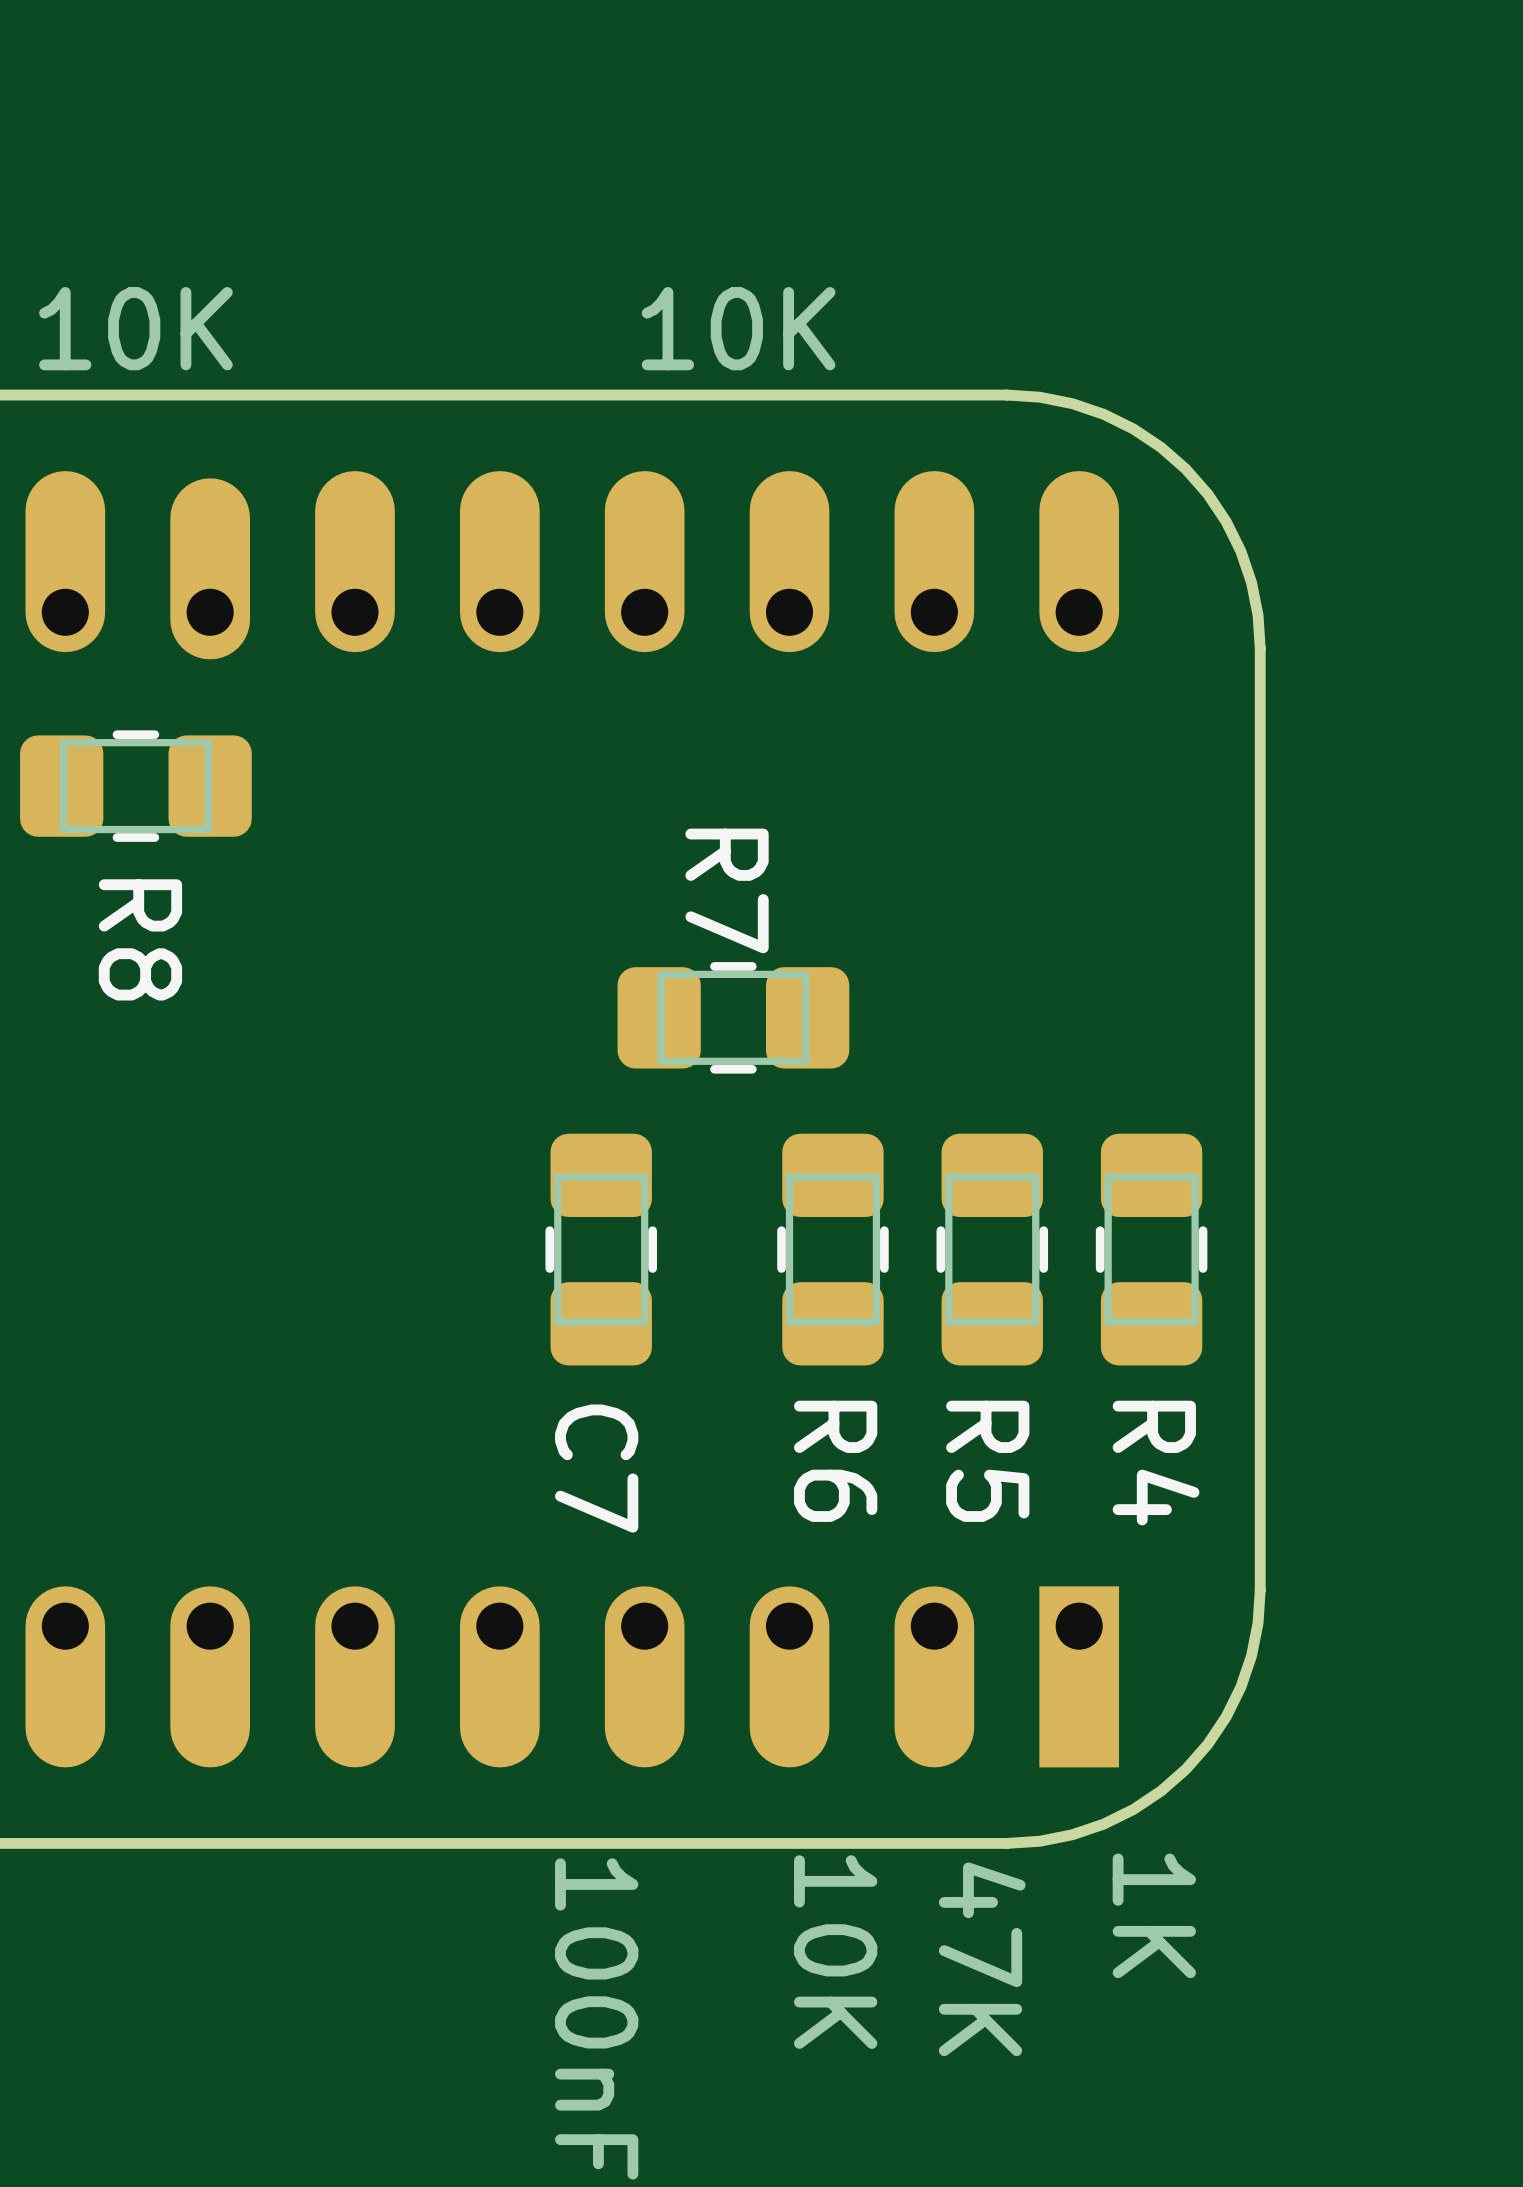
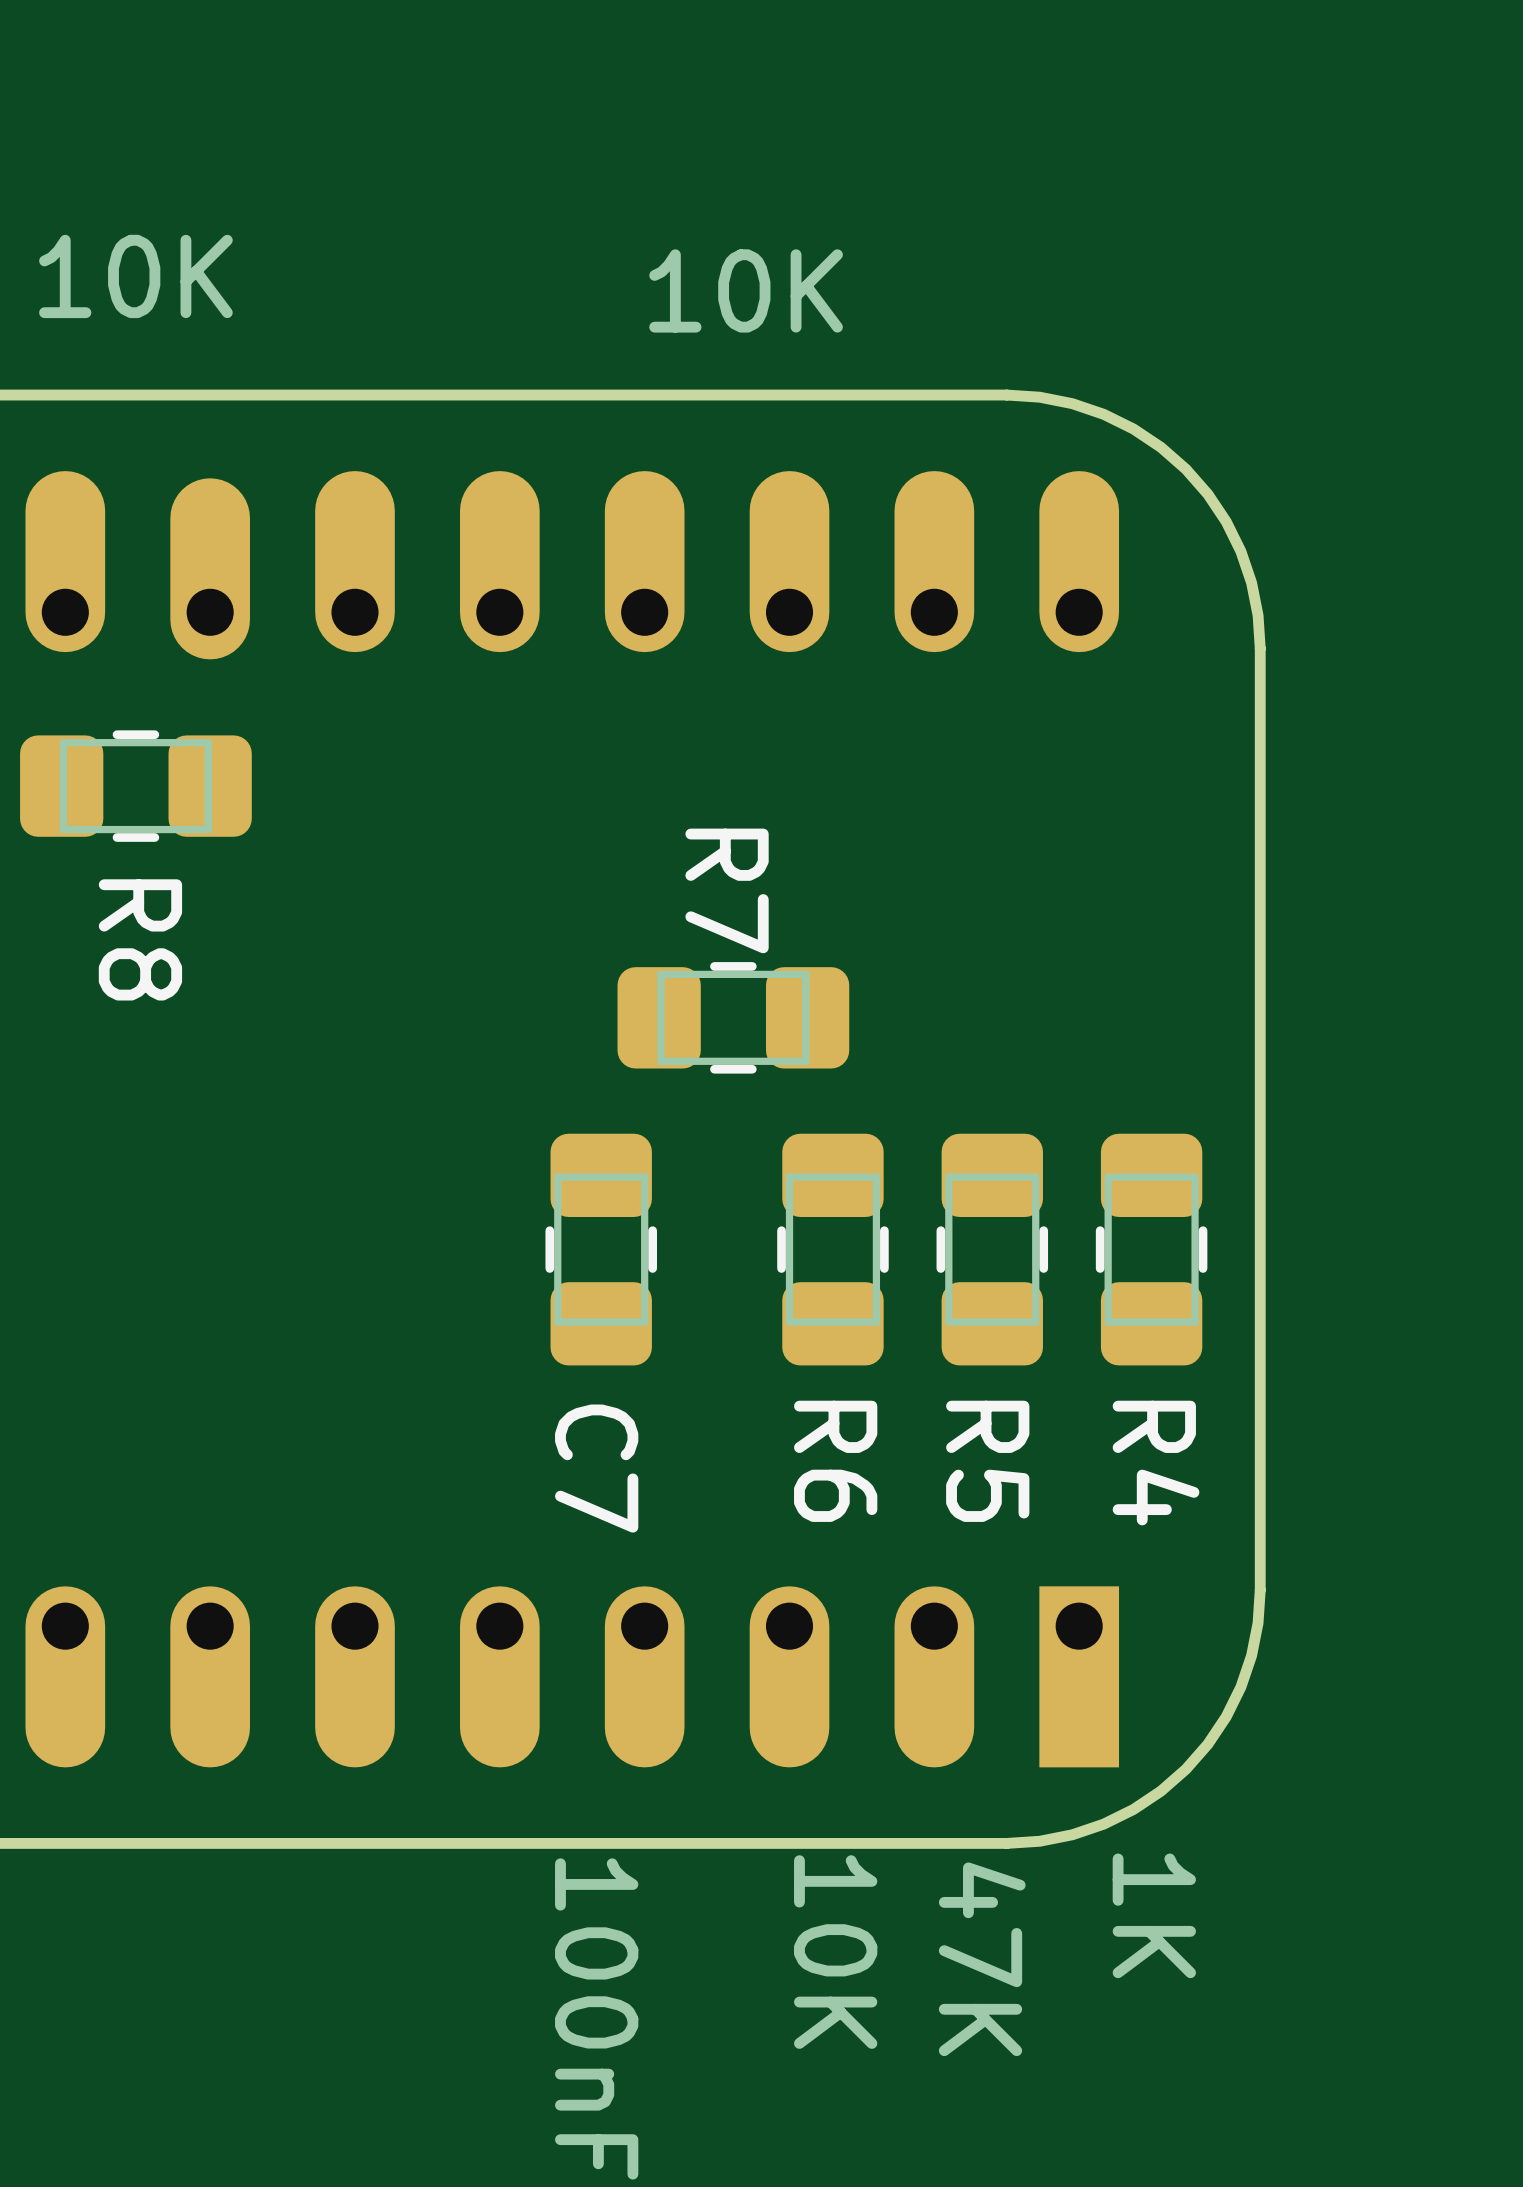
R8 value position: 10K (135, 328) -> 10K (135, 276)
R7 value position: 10K (738, 328) -> 10K (746, 290)

